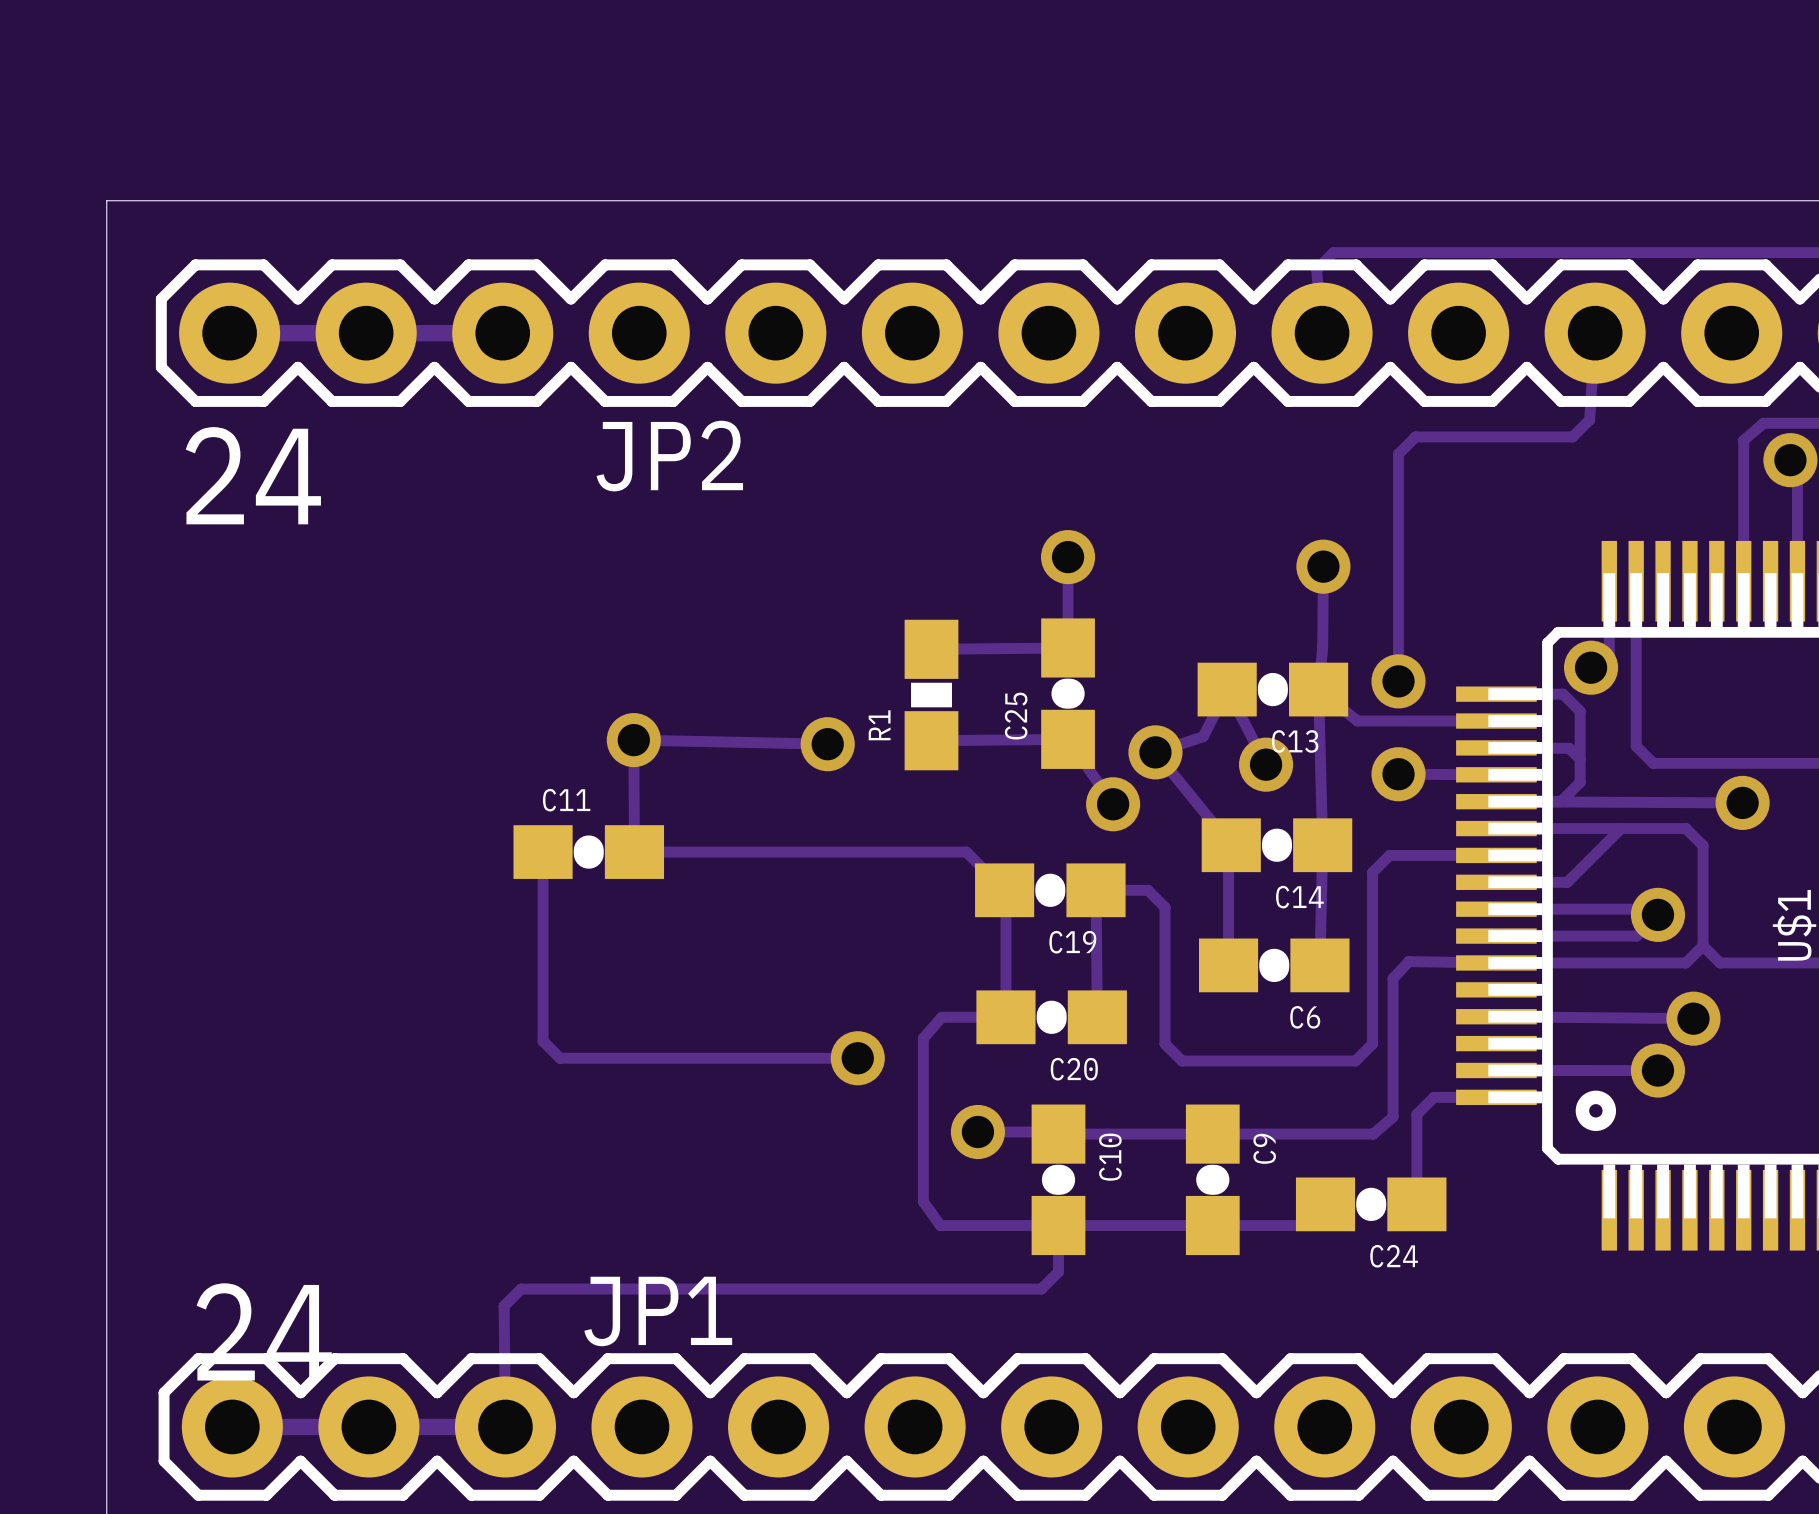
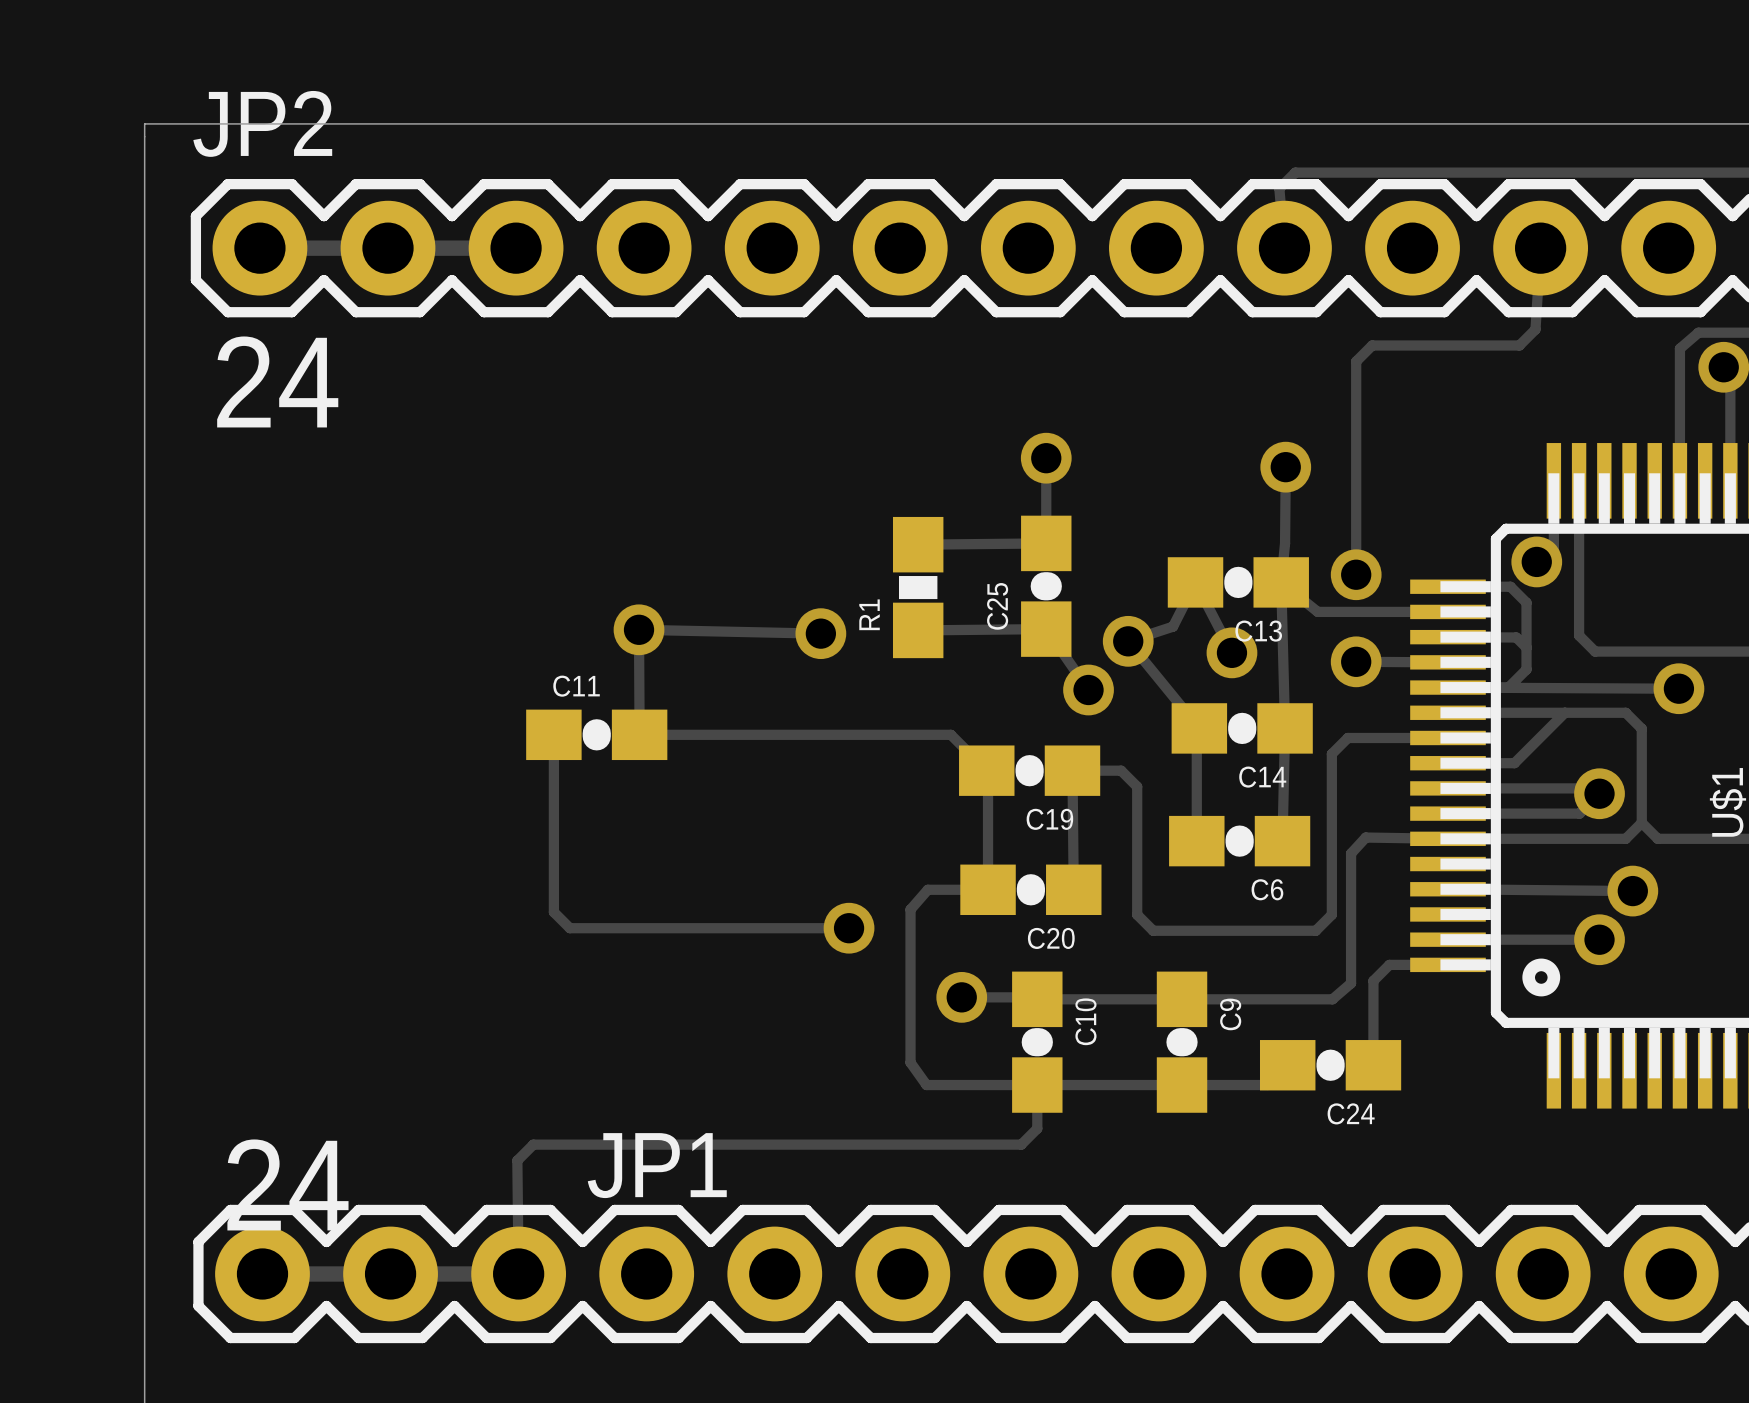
JP2 name position: JP2 (669, 456) -> JP2 (262, 123)

